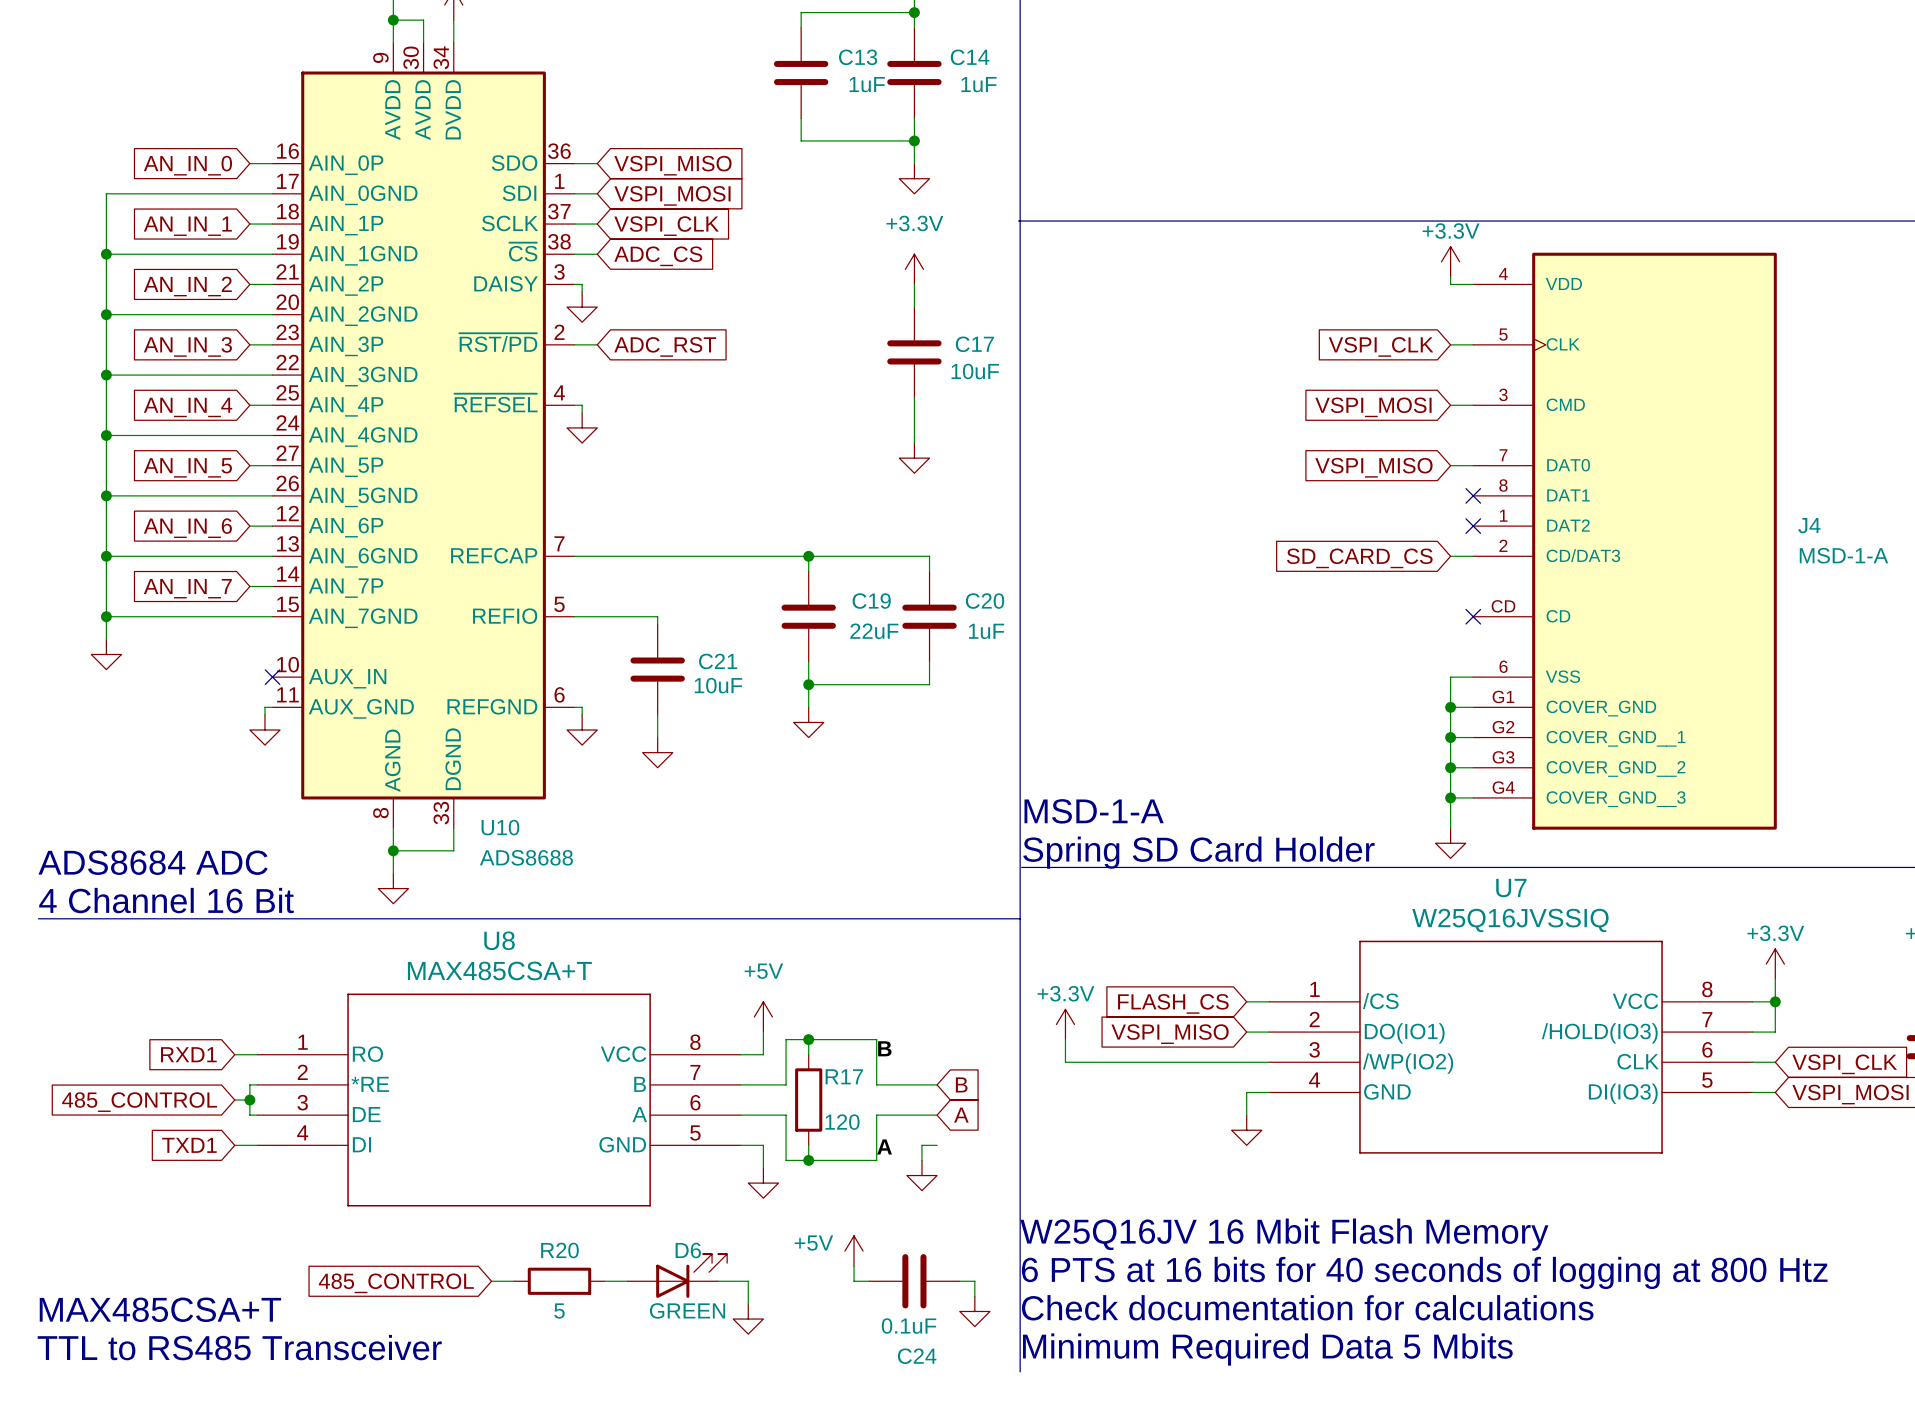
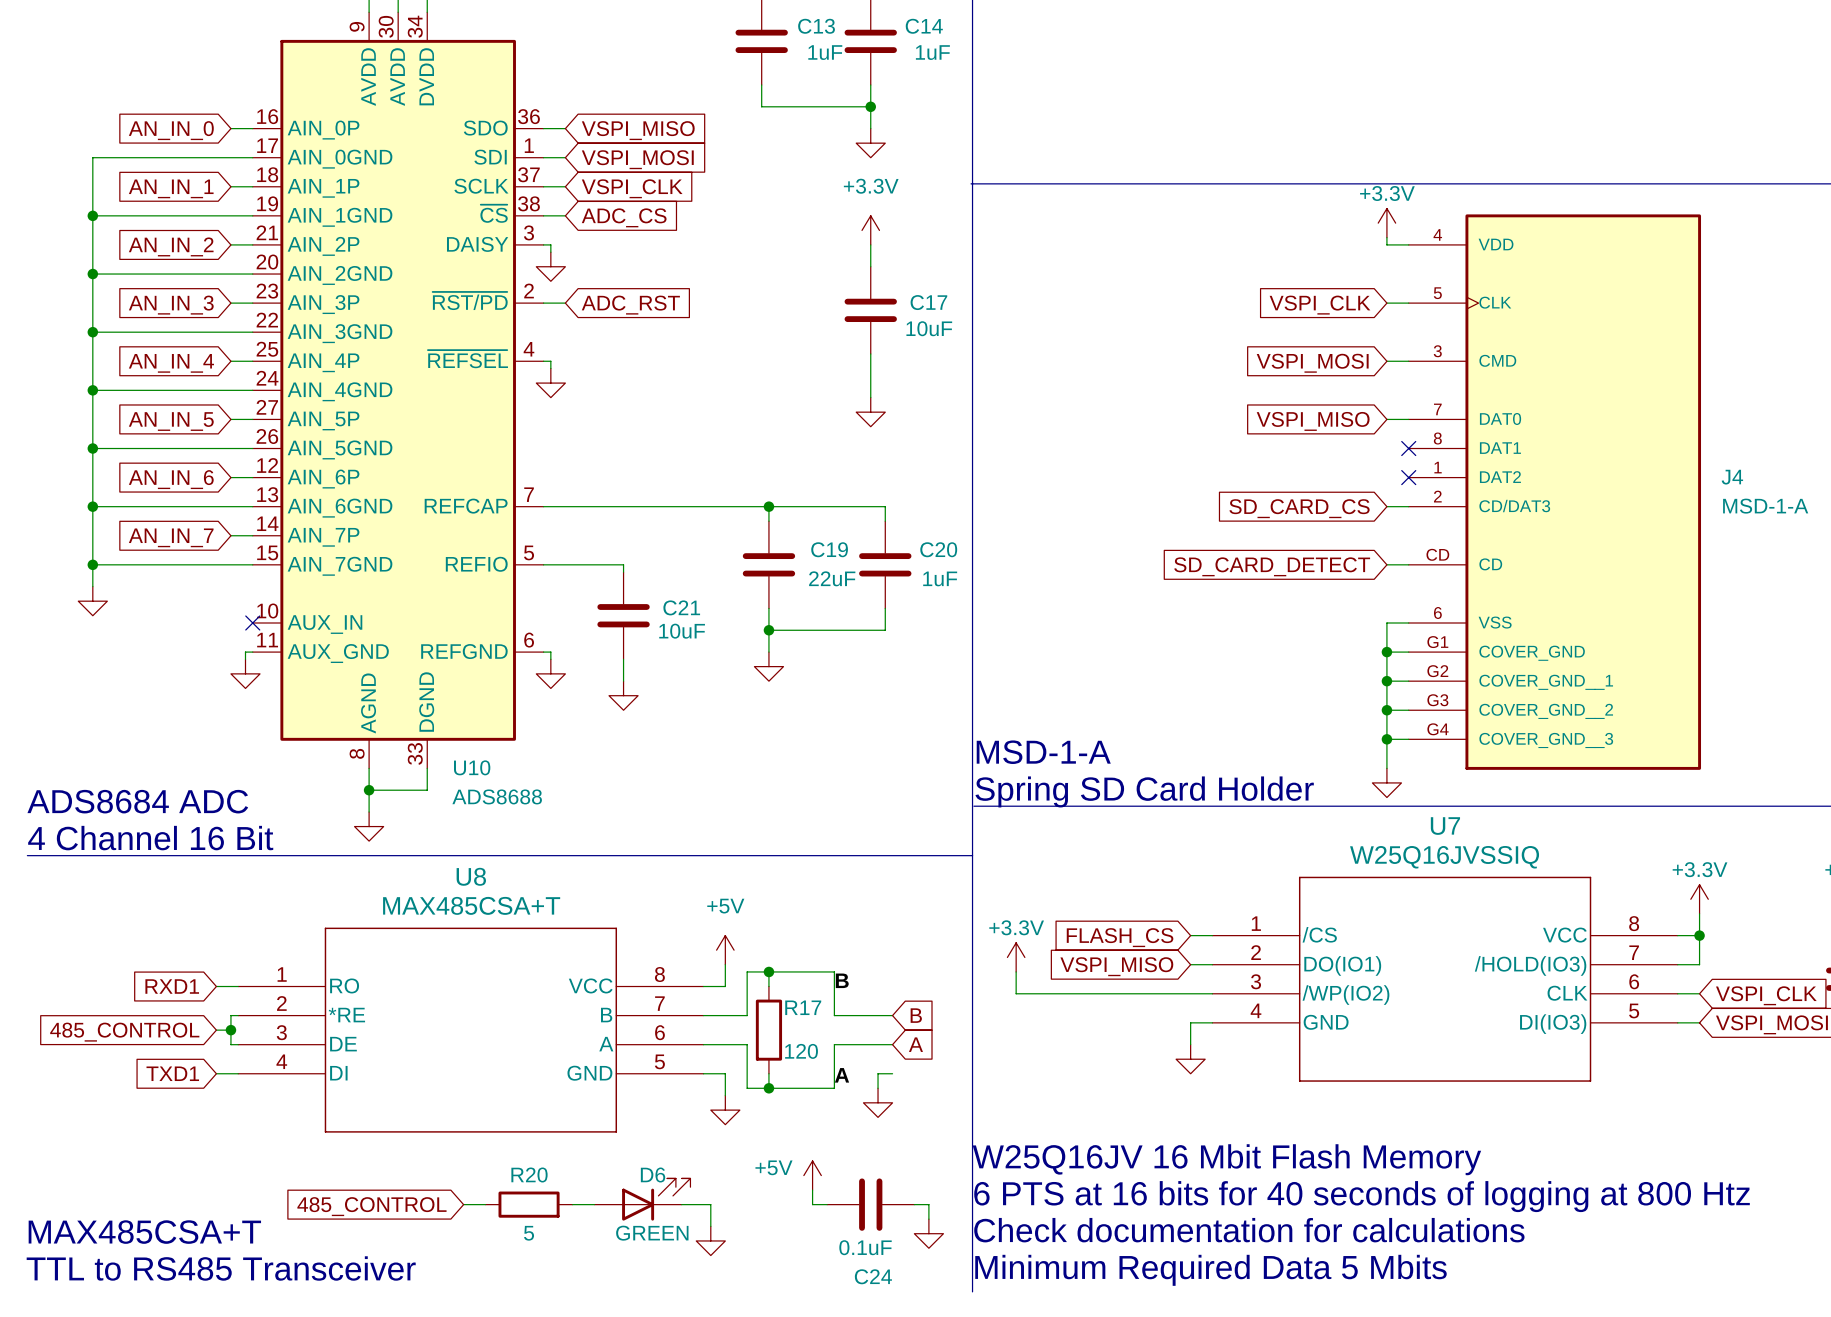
wire: none -> (1386, 564) (1408, 564)
no-connect mark: (1473, 616) -> none
global label: none -> SD_CARD_DETECT (1272, 566)

